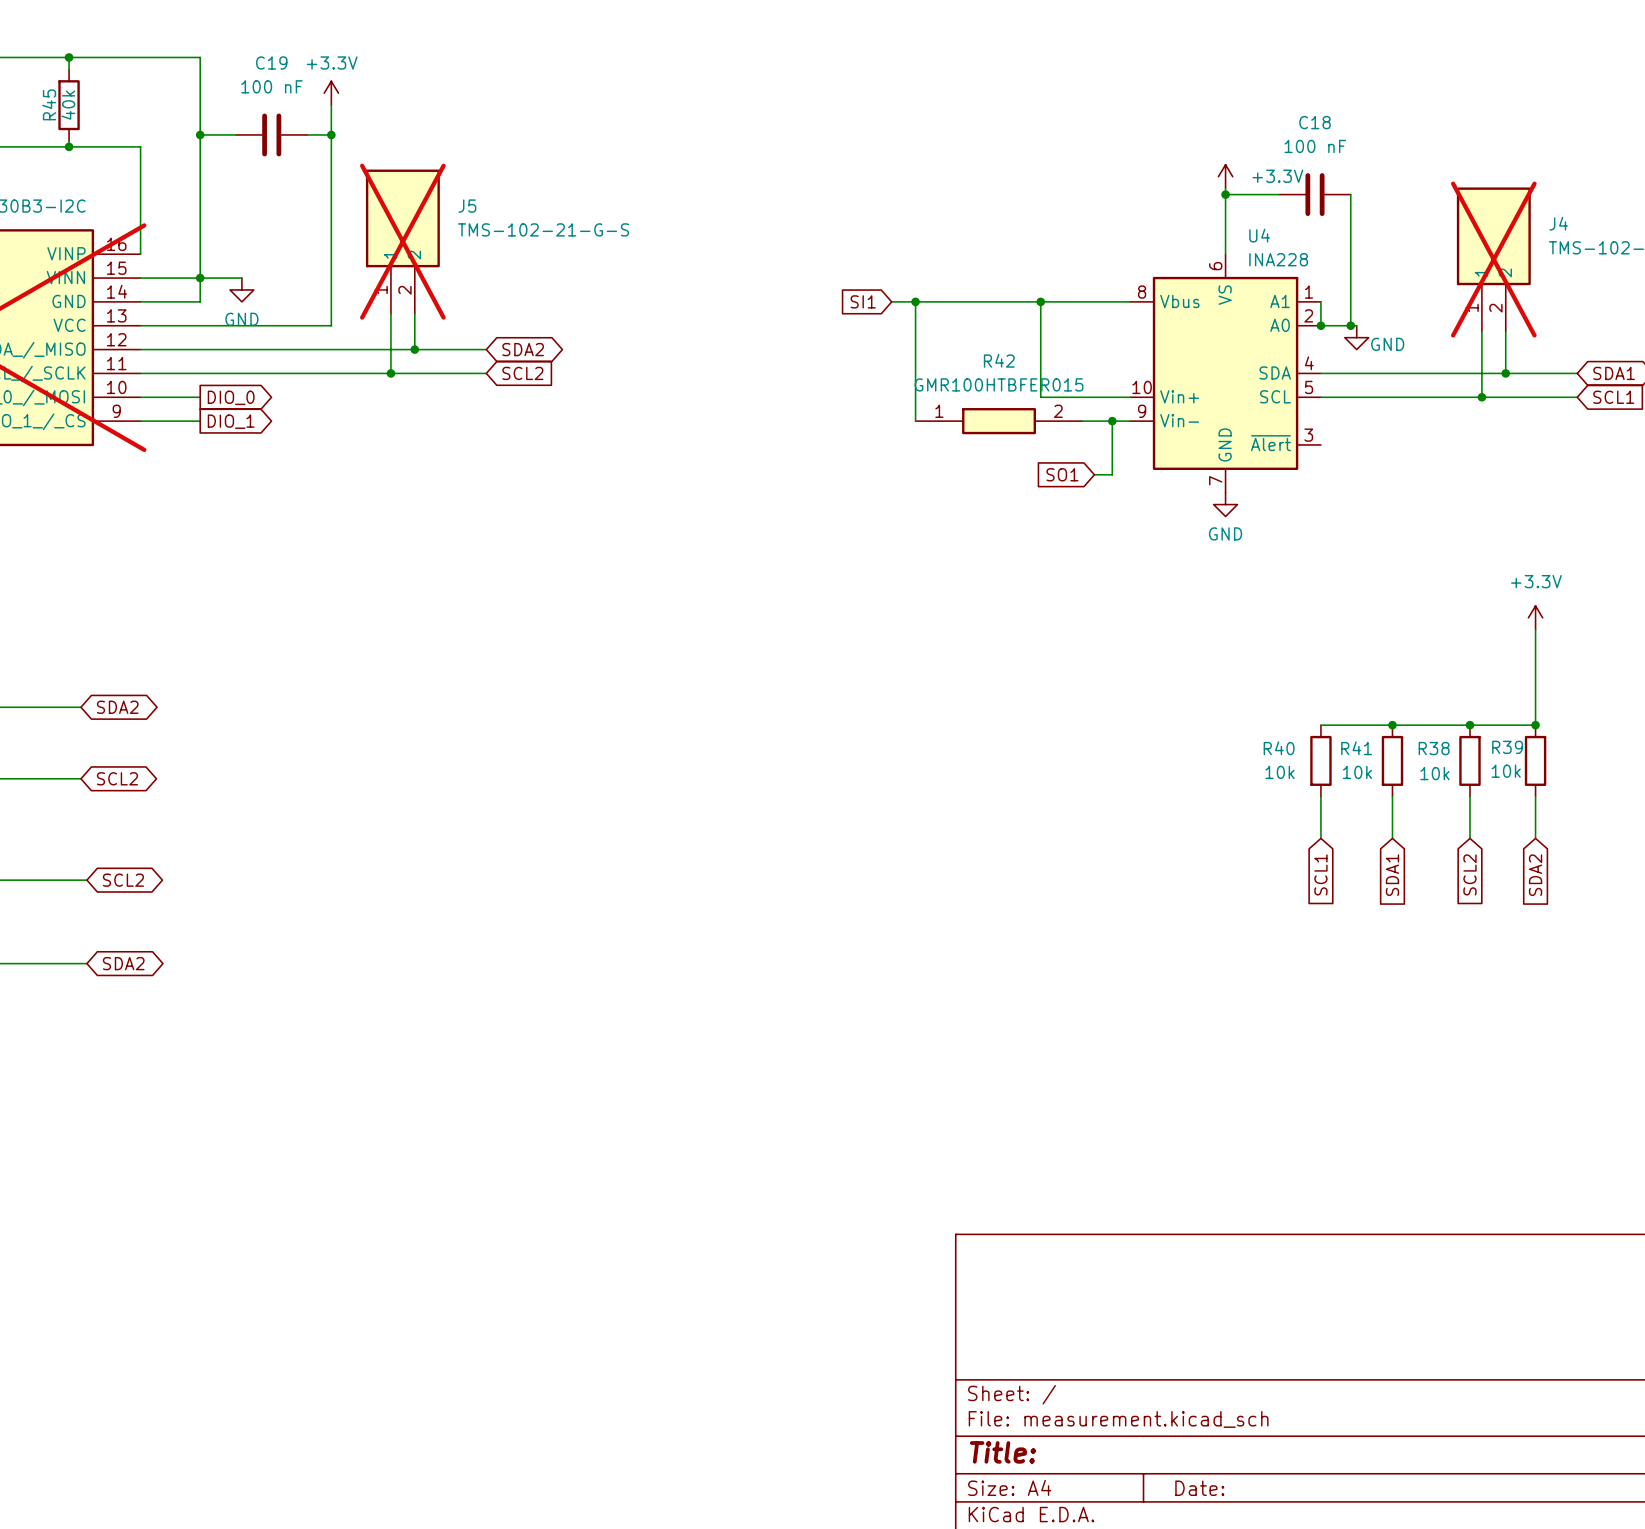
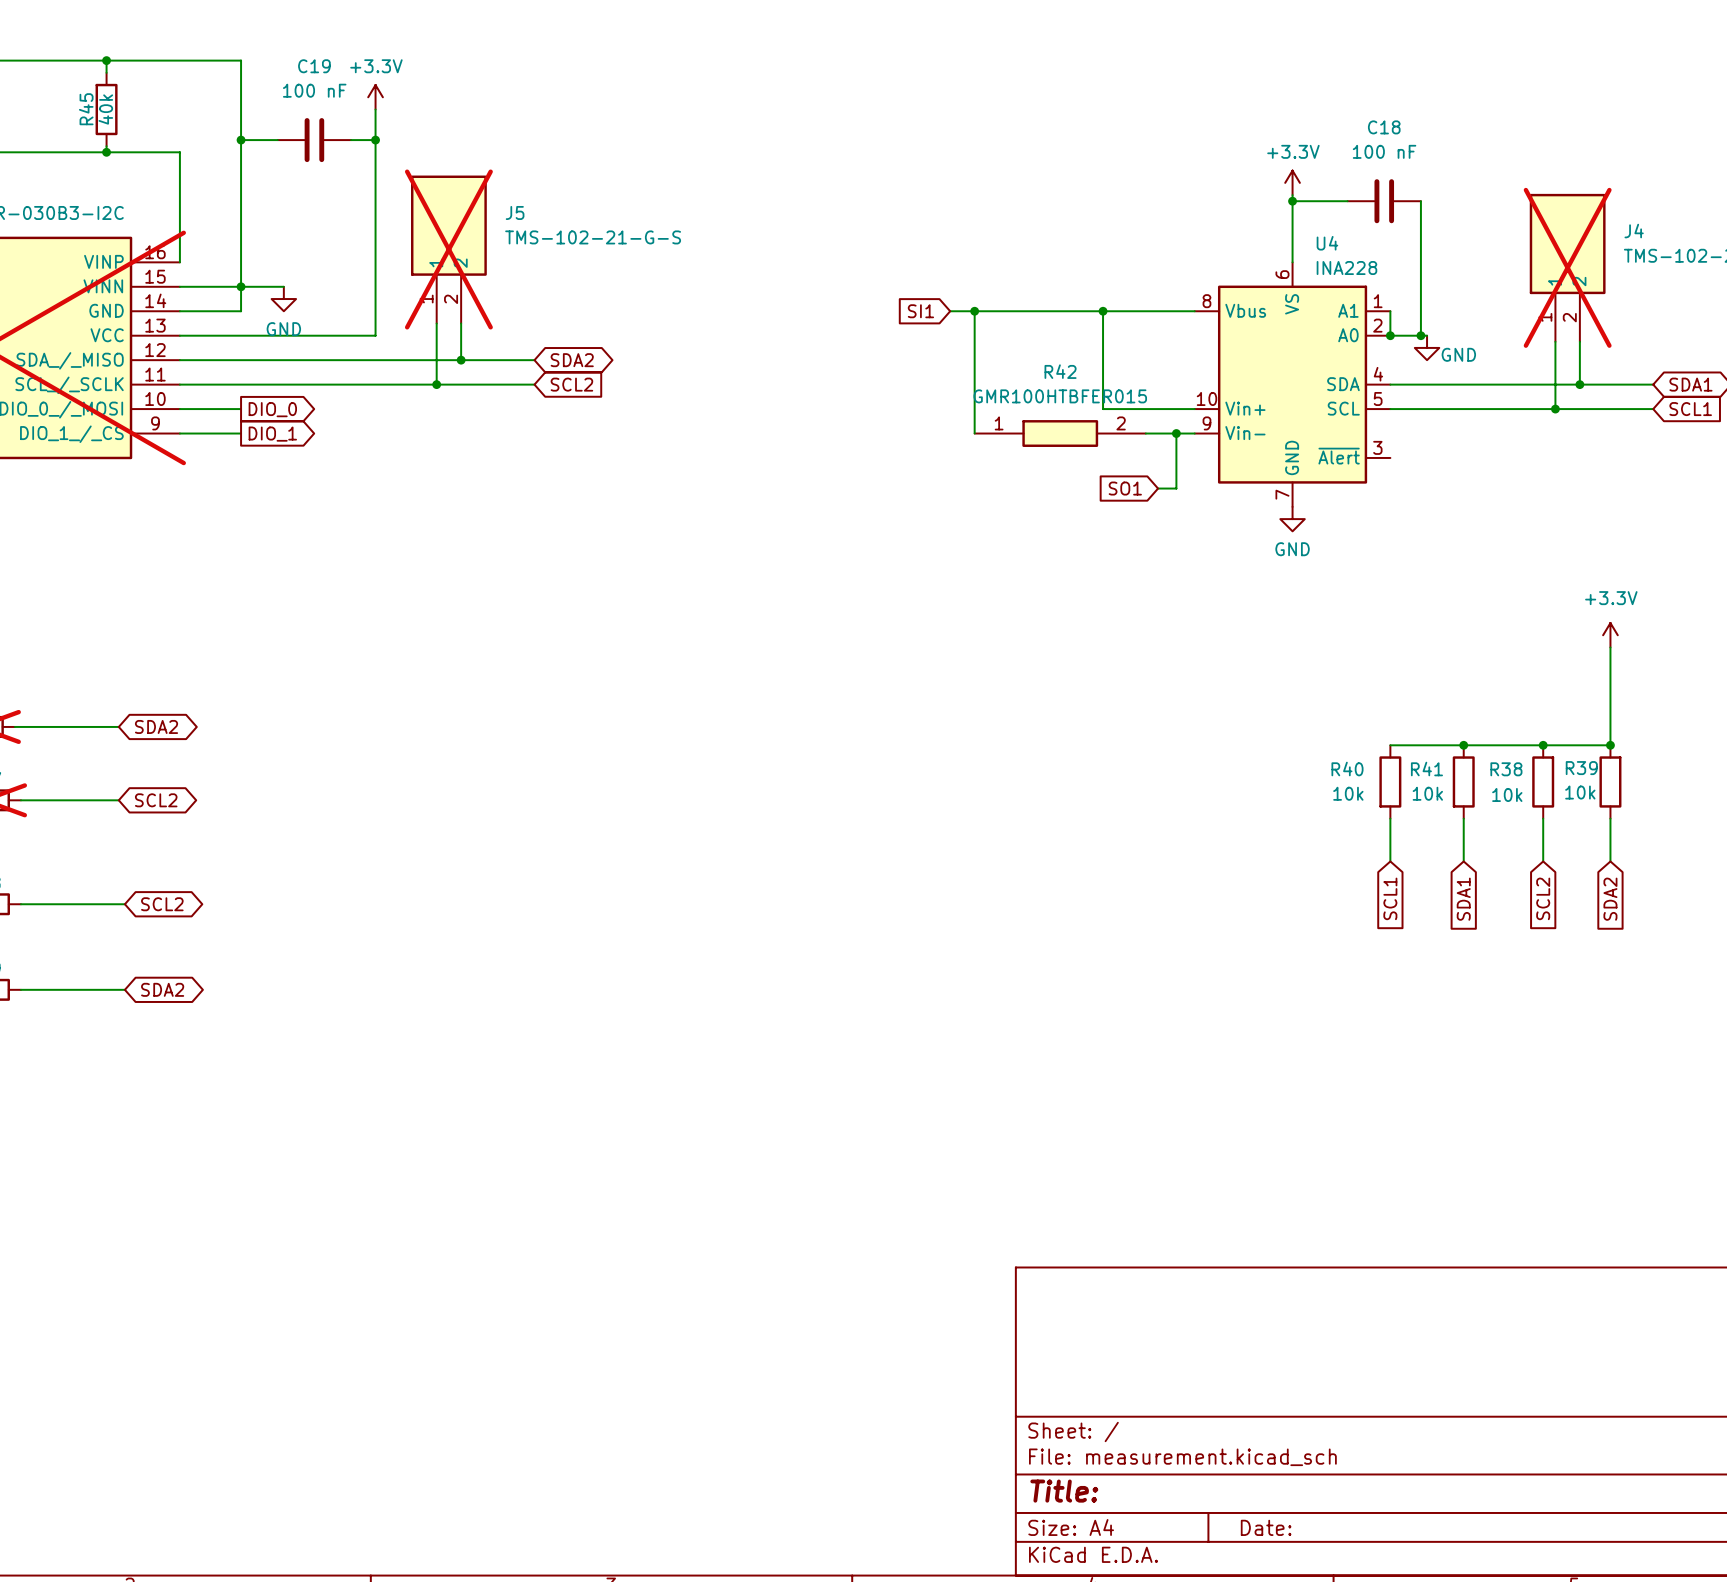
power symbol text position: +3.3V (1277, 176) -> +3.3V (1293, 151)

